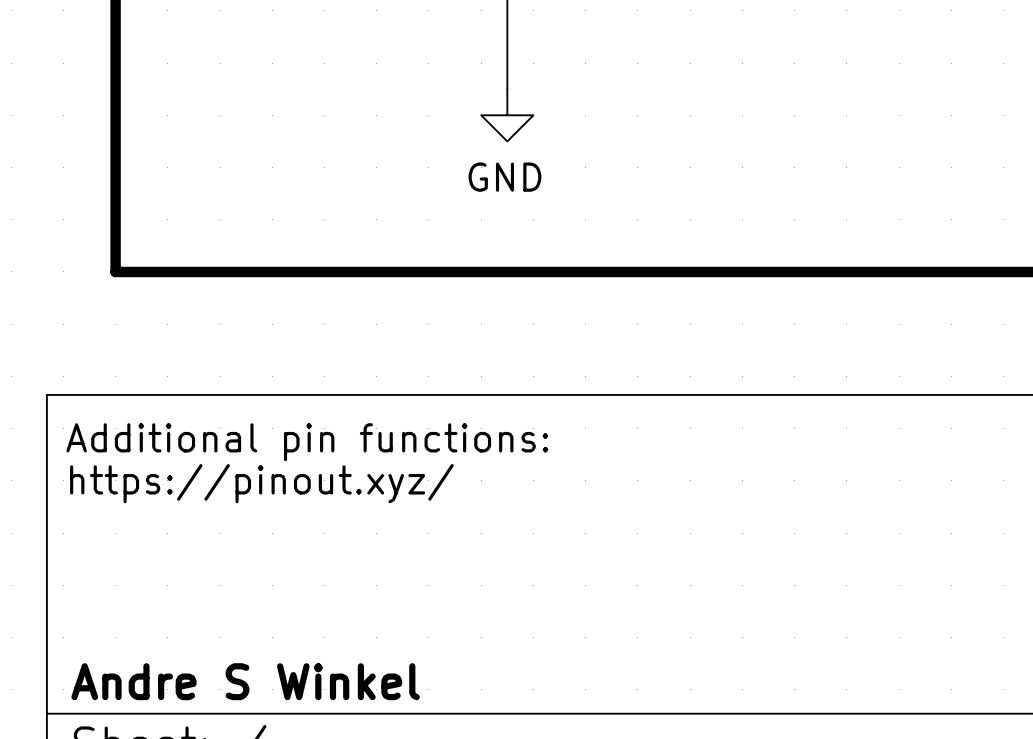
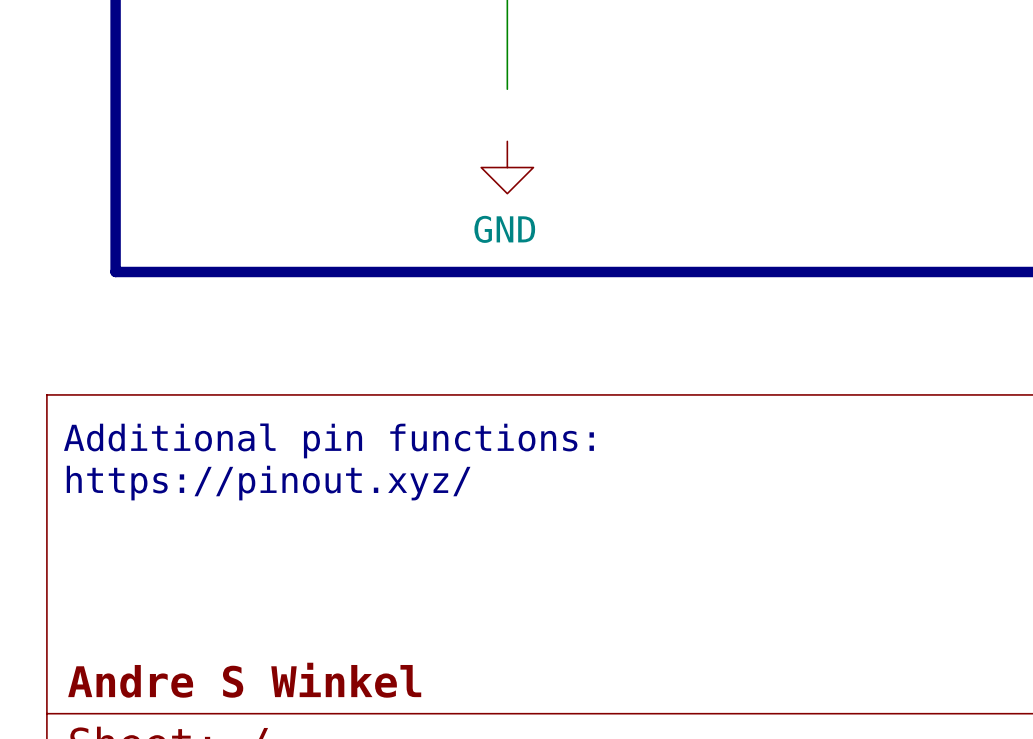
power symbol position: GND (507, 115) -> GND (507, 167)

